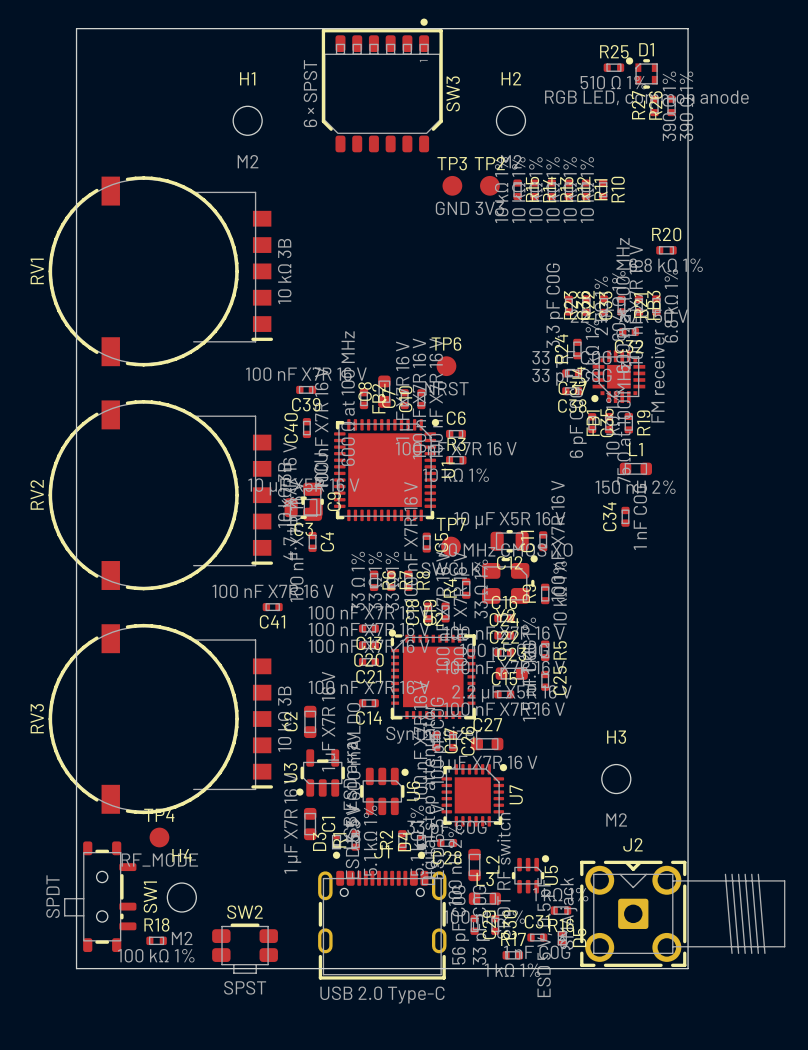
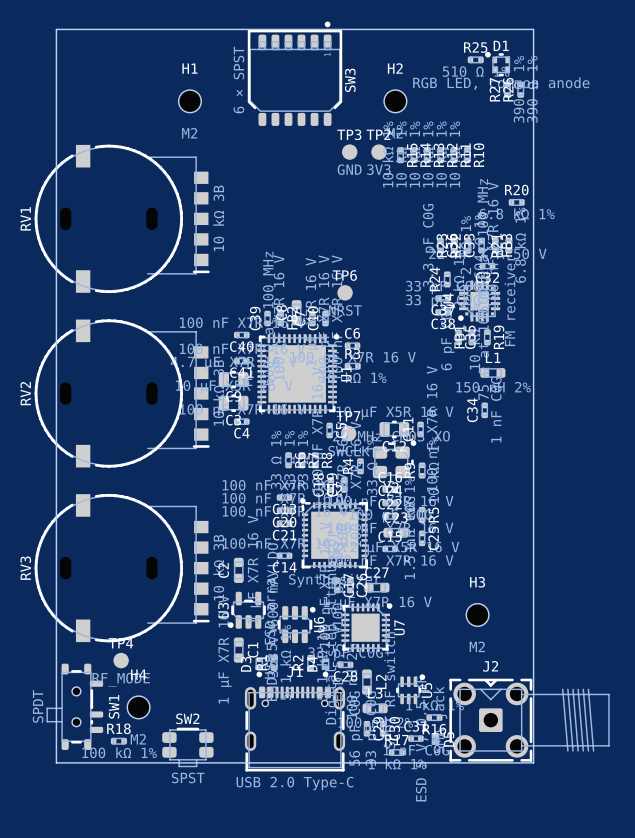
C39 rotation: 0° (306, 389) -> 90° clockwise (267, 318)
C39 position: (306, 389) -> (267, 318)
C40 rotation: 0° (306, 428) -> 90° clockwise (241, 335)
C9 rotation: 0° (312, 501) -> 90° clockwise (233, 379)
C9 position: (312, 501) -> (233, 379)
C4 rotation: 0° (312, 541) -> 90° clockwise (241, 421)
C41 position: (272, 607) -> (241, 361)

